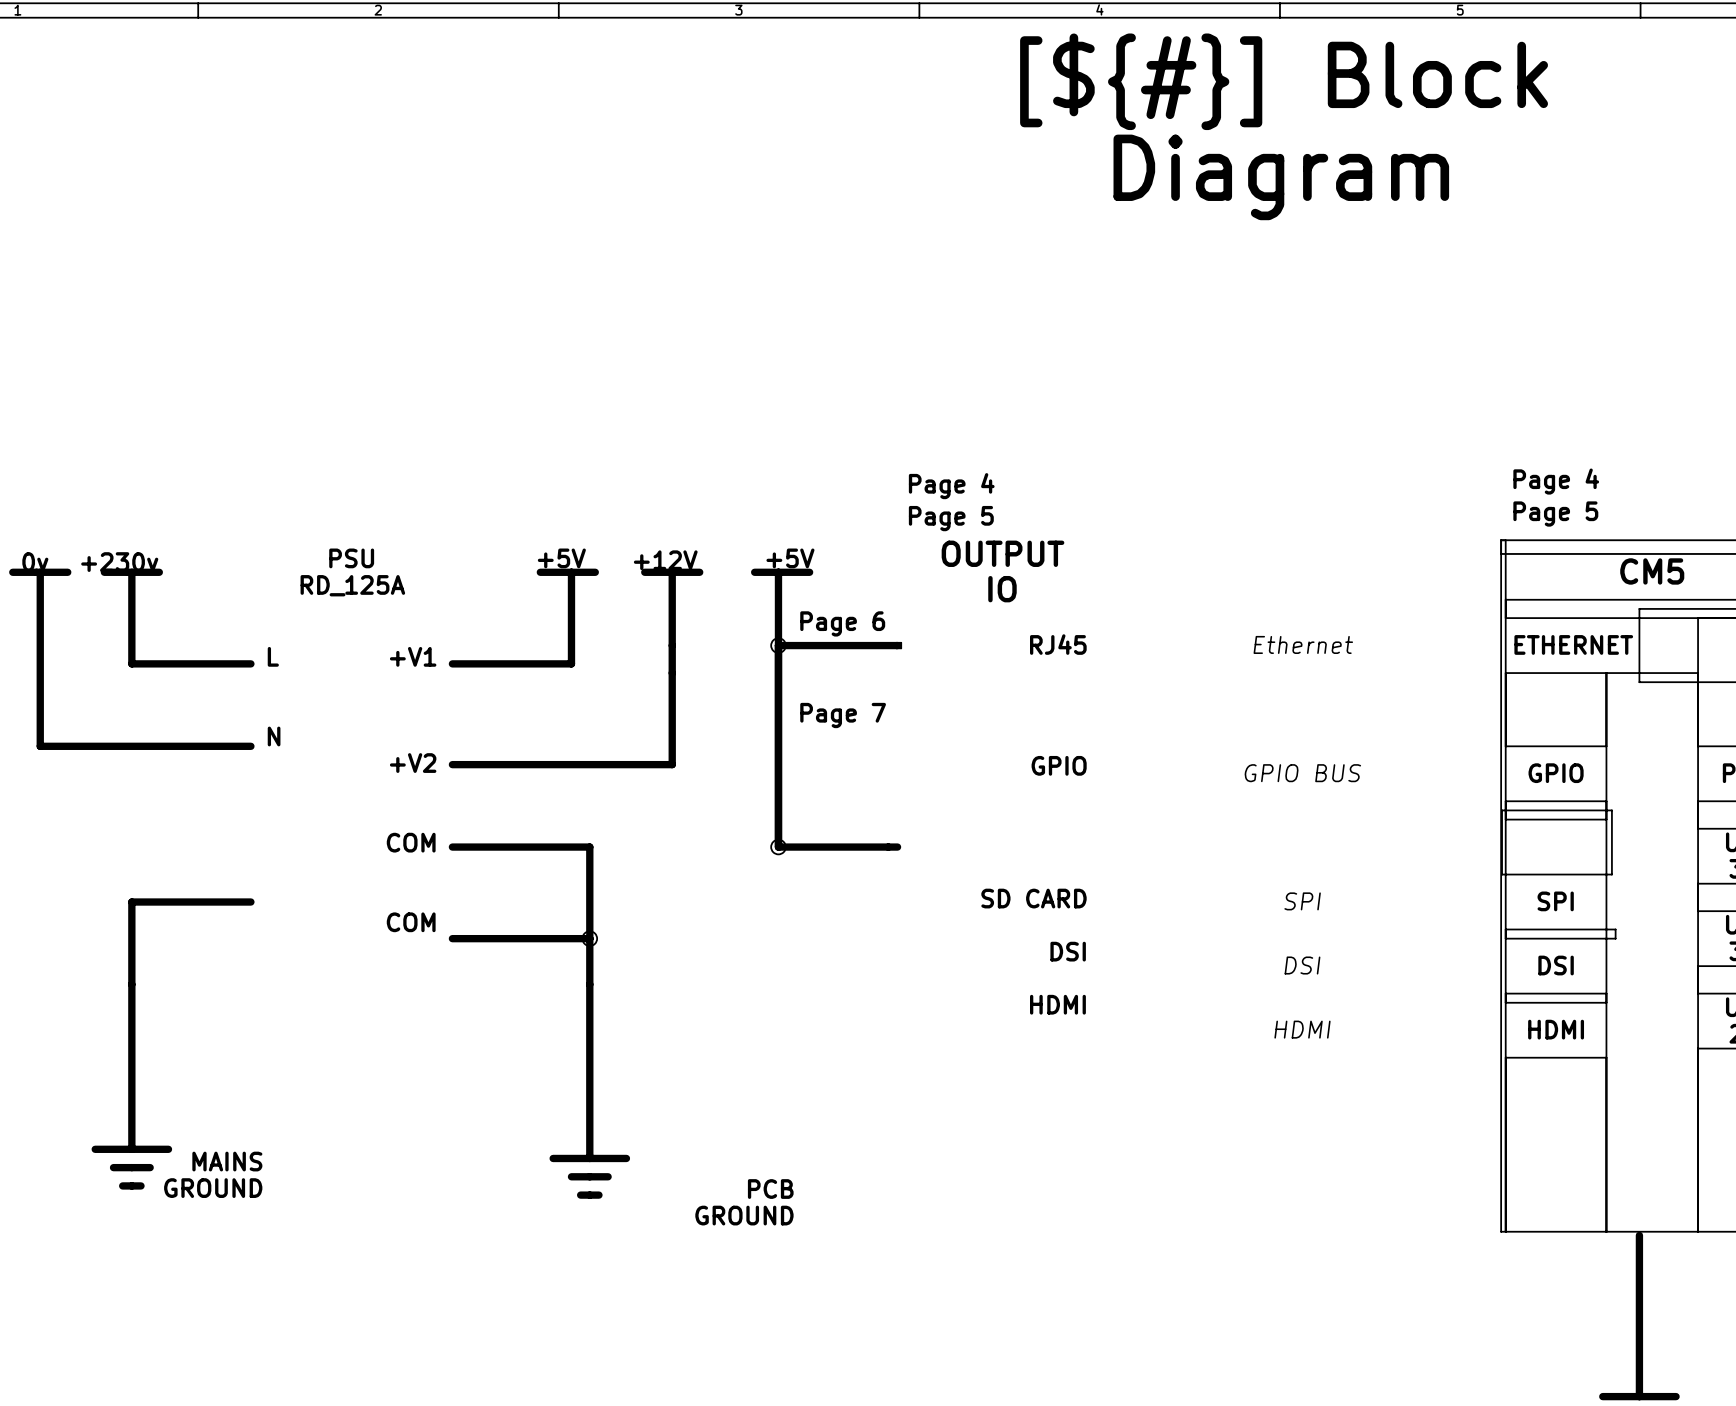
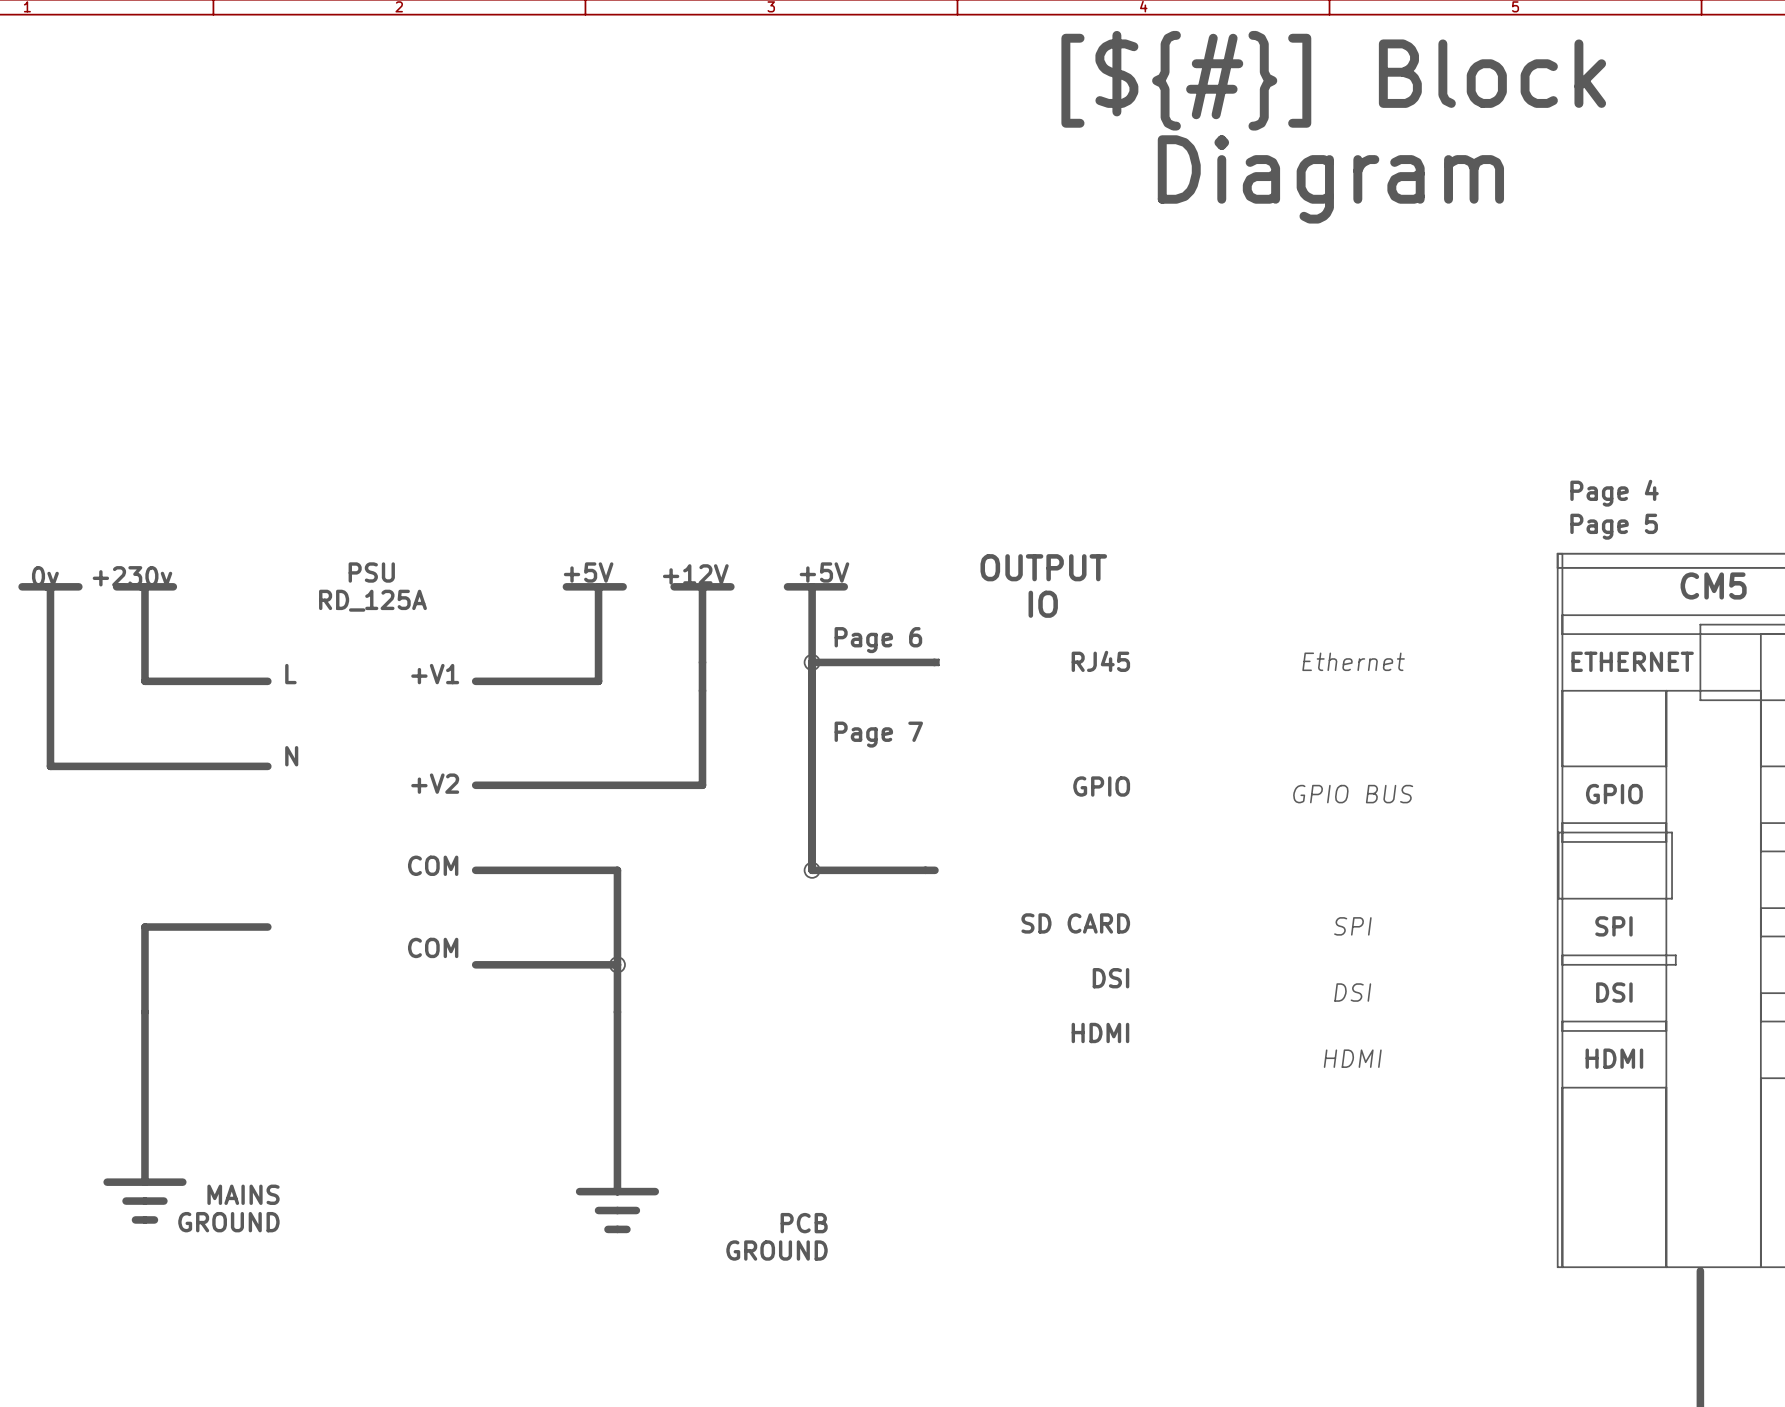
text: Page 4 (951, 486) -> none
text: Page 5 (951, 518) -> none

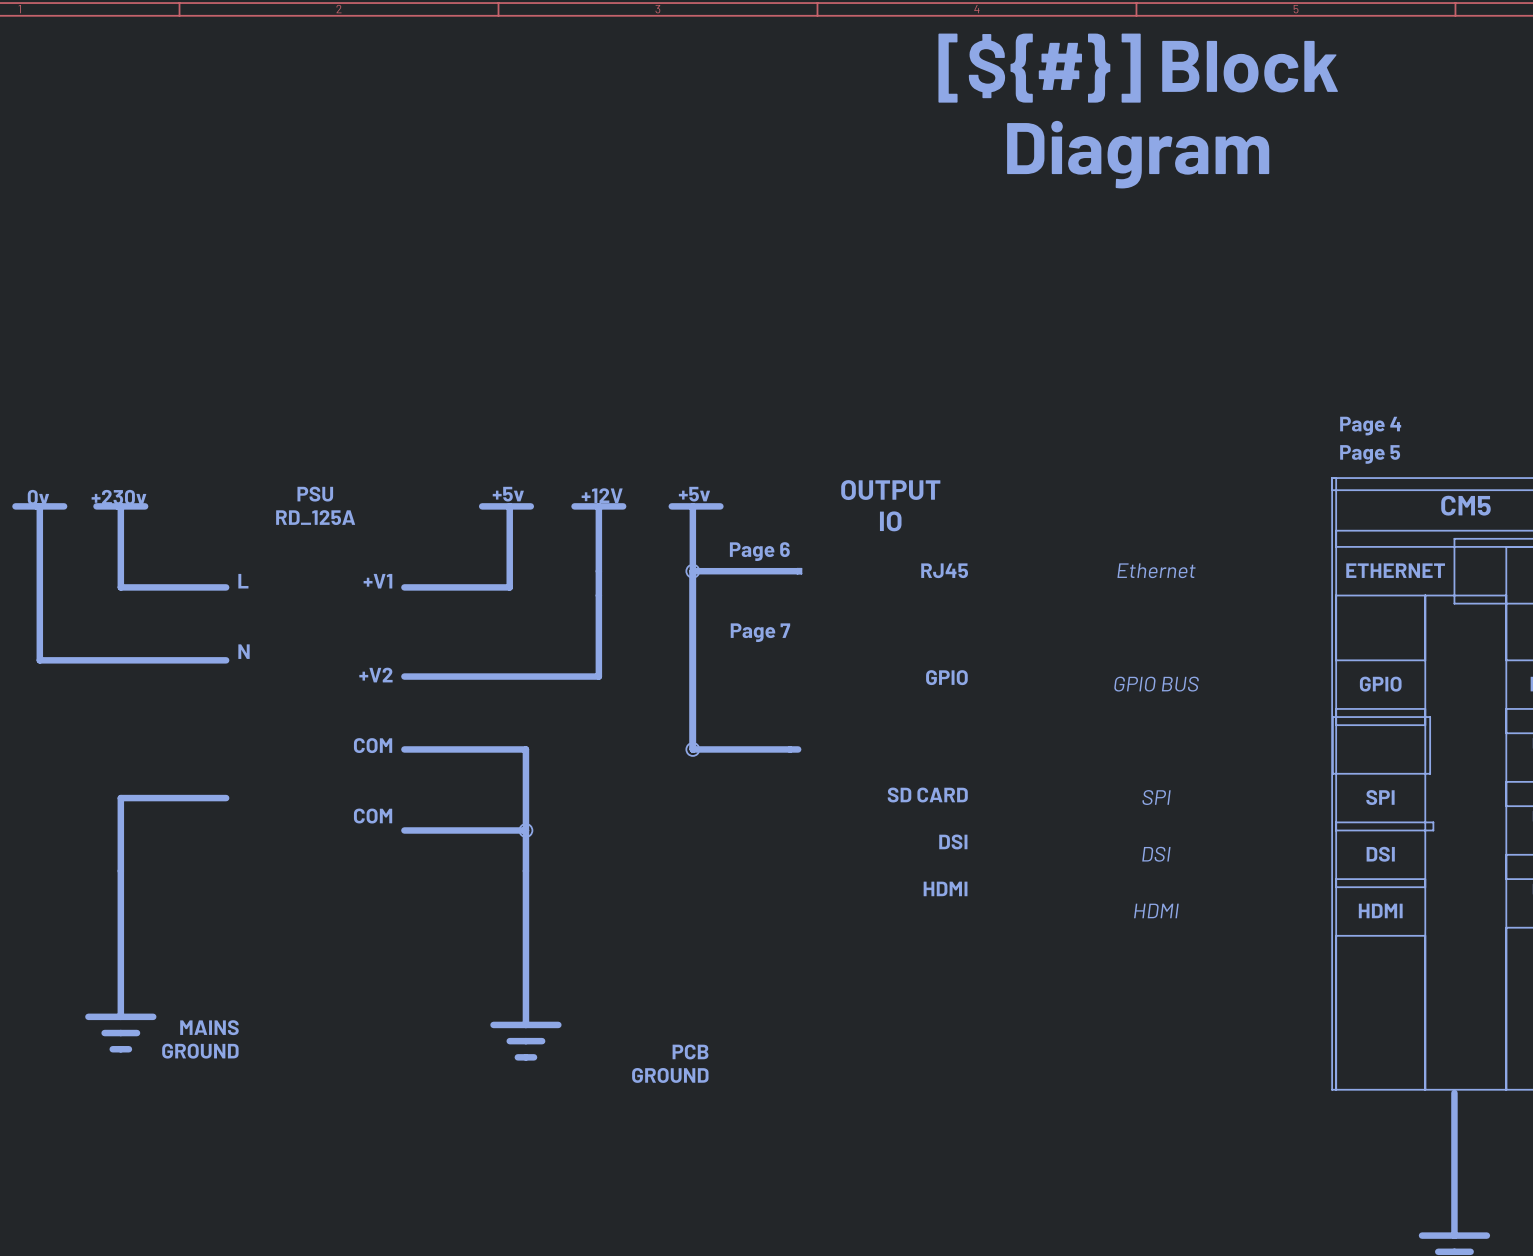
text: +5V (588, 572) -> +5v (508, 494)
text: +5V (824, 572) -> +5v (694, 494)

